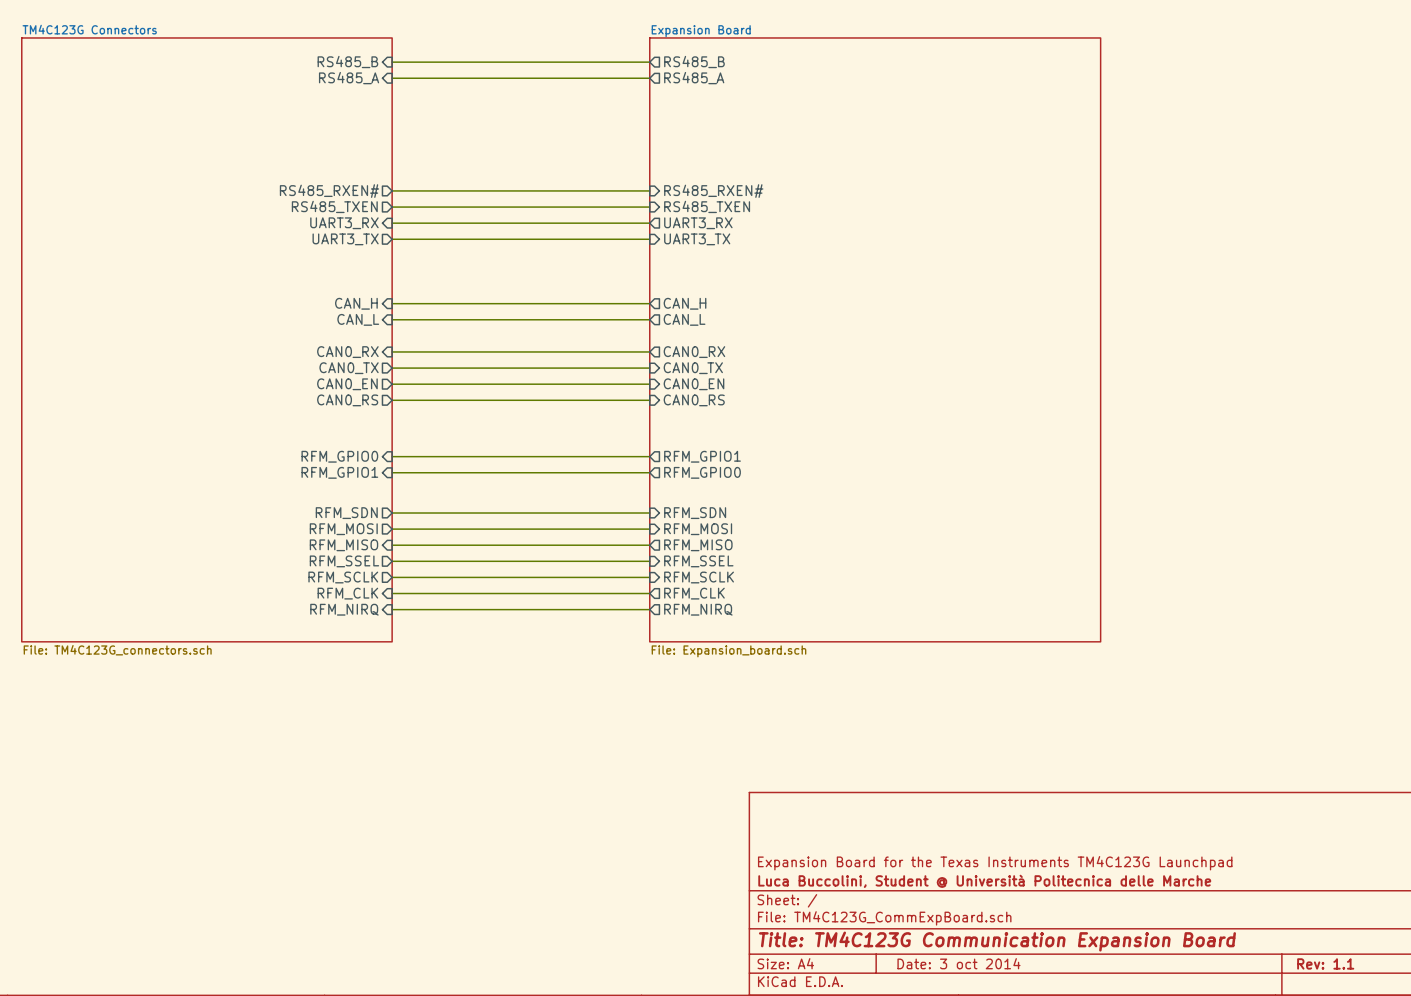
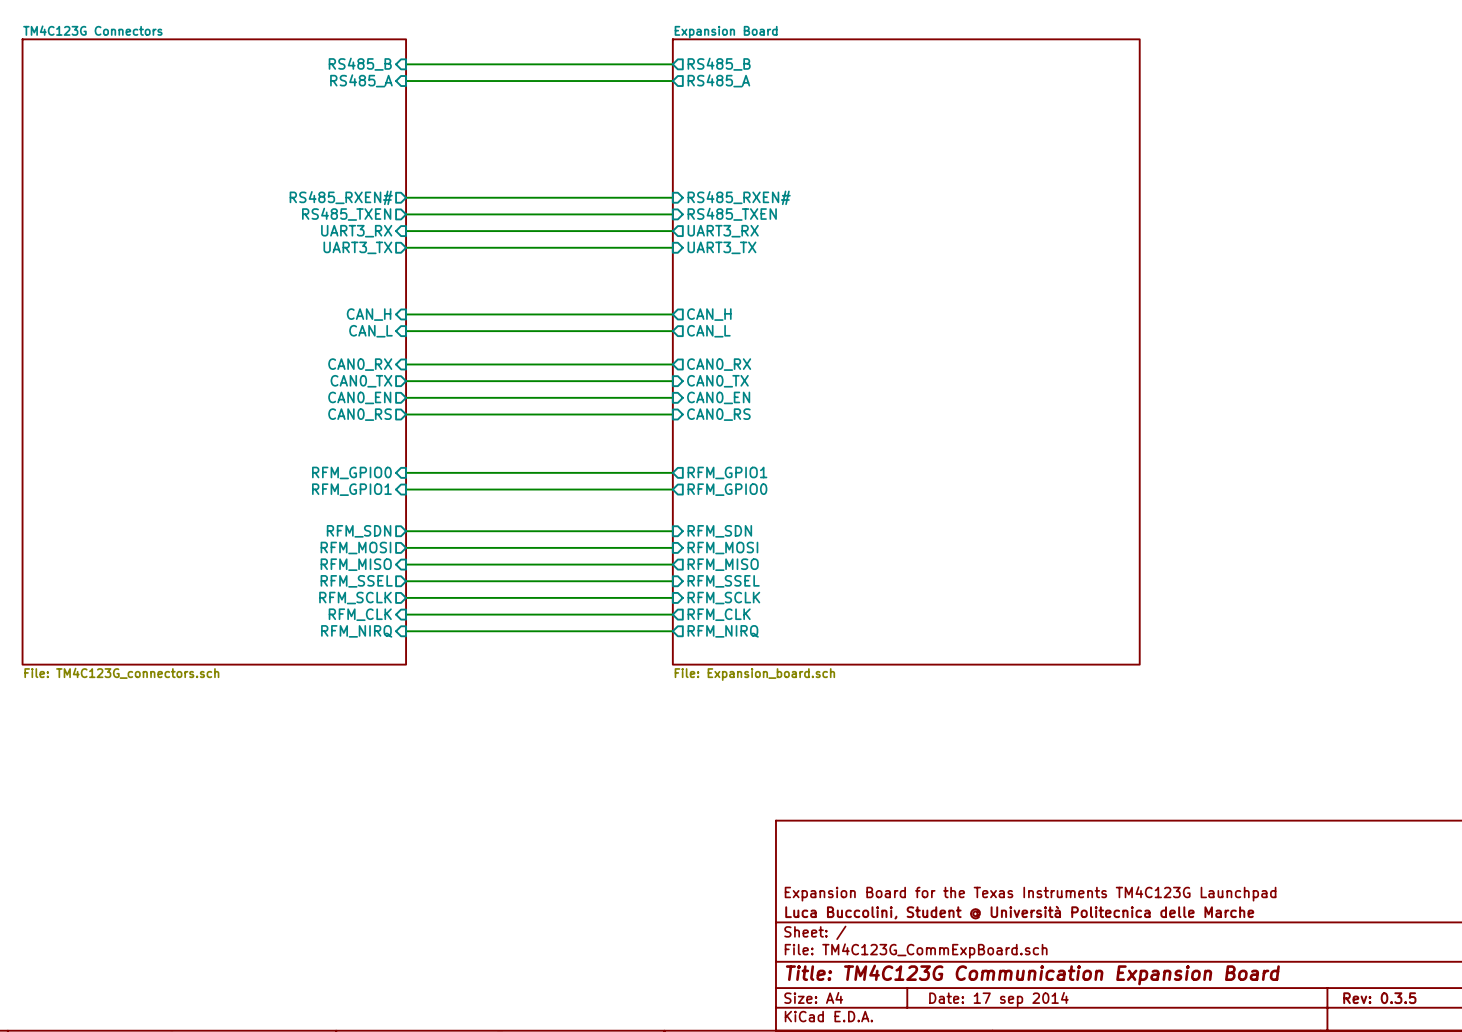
title block: Date: 3 oct 2014 (958, 963) -> Date: 17 sep 2014 (998, 999)
title block: Rev: 1.1 (1325, 963) -> Rev: 0.3.5 (1379, 998)

